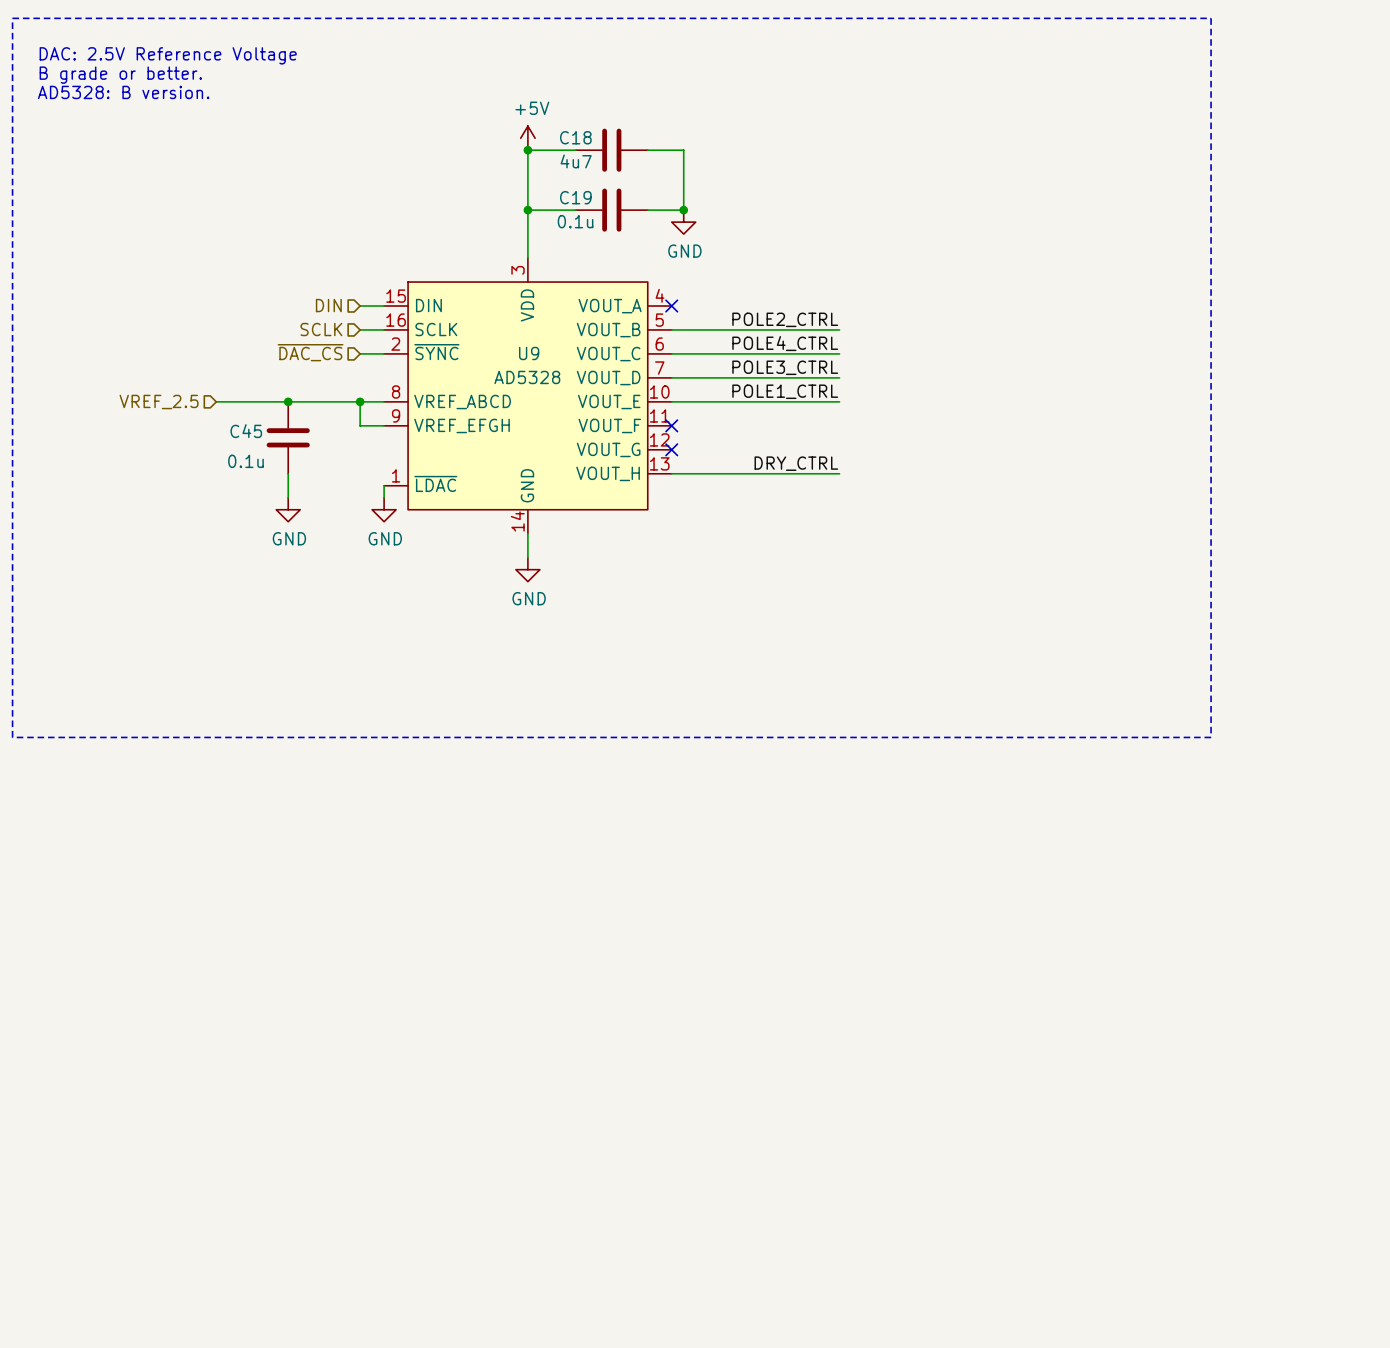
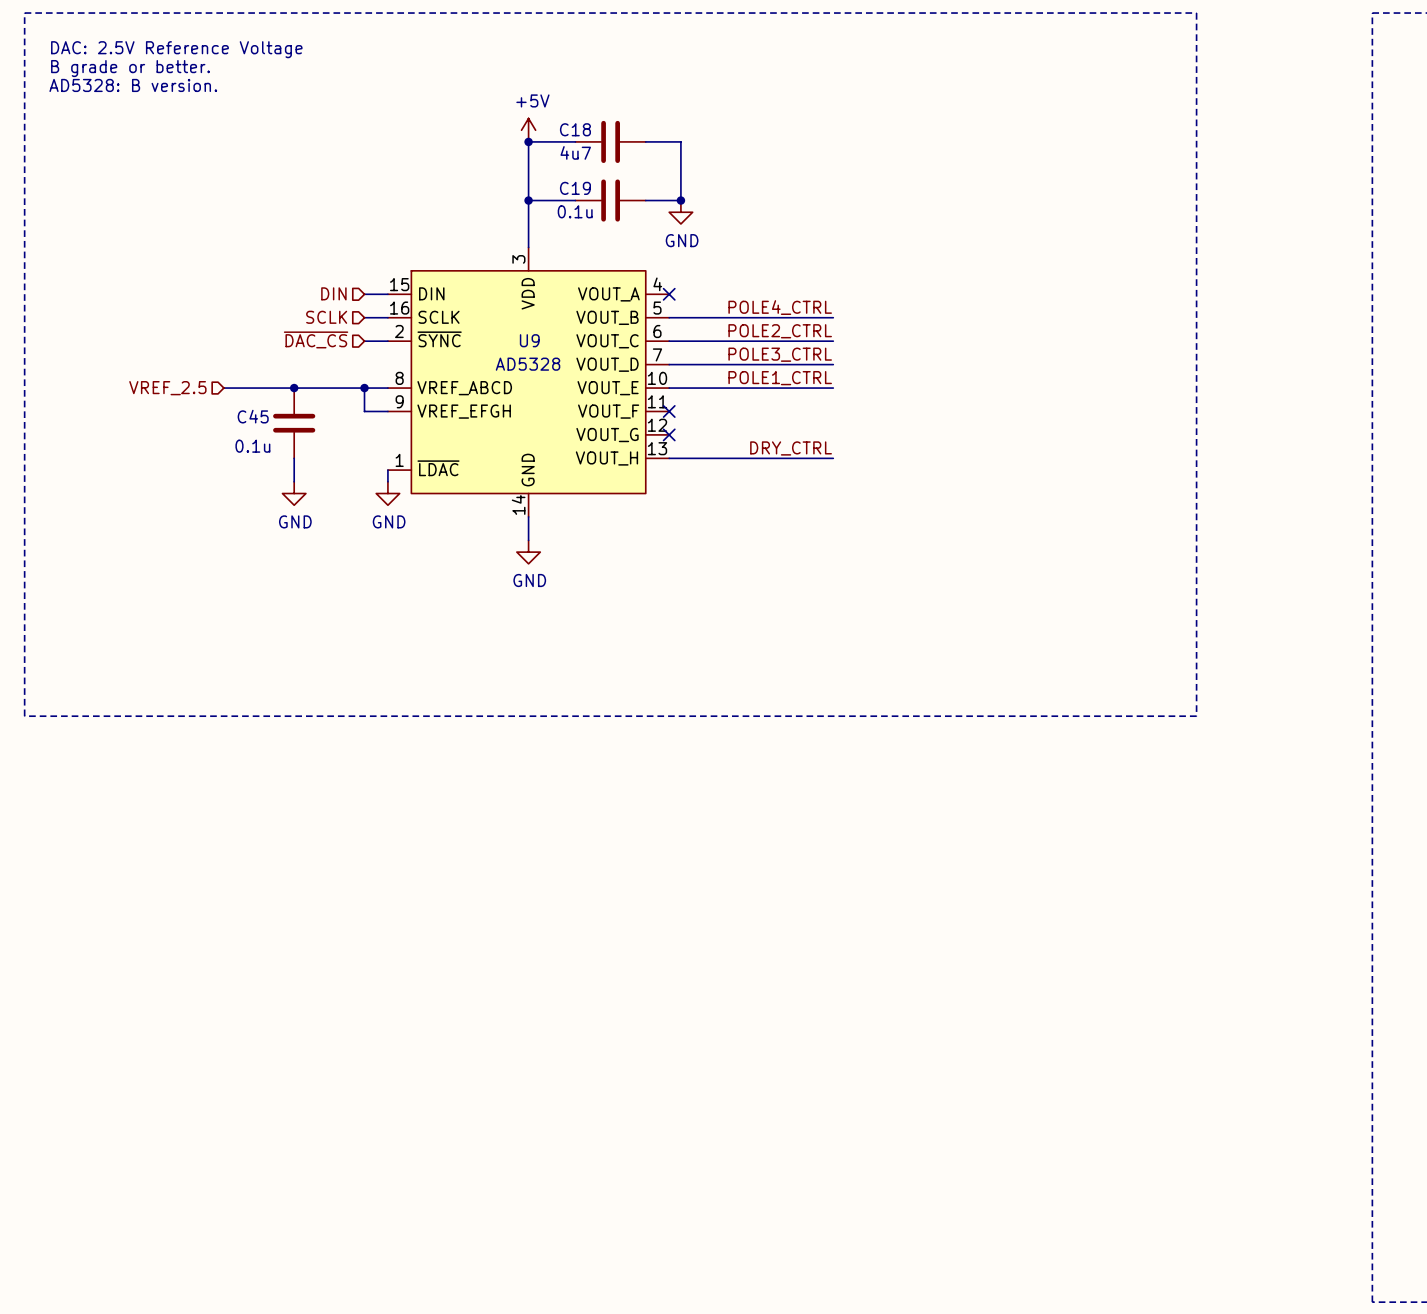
label: POLE2_CTRL (785, 319) -> POLE4_CTRL (780, 307)
label: POLE4_CTRL (785, 343) -> POLE2_CTRL (780, 331)

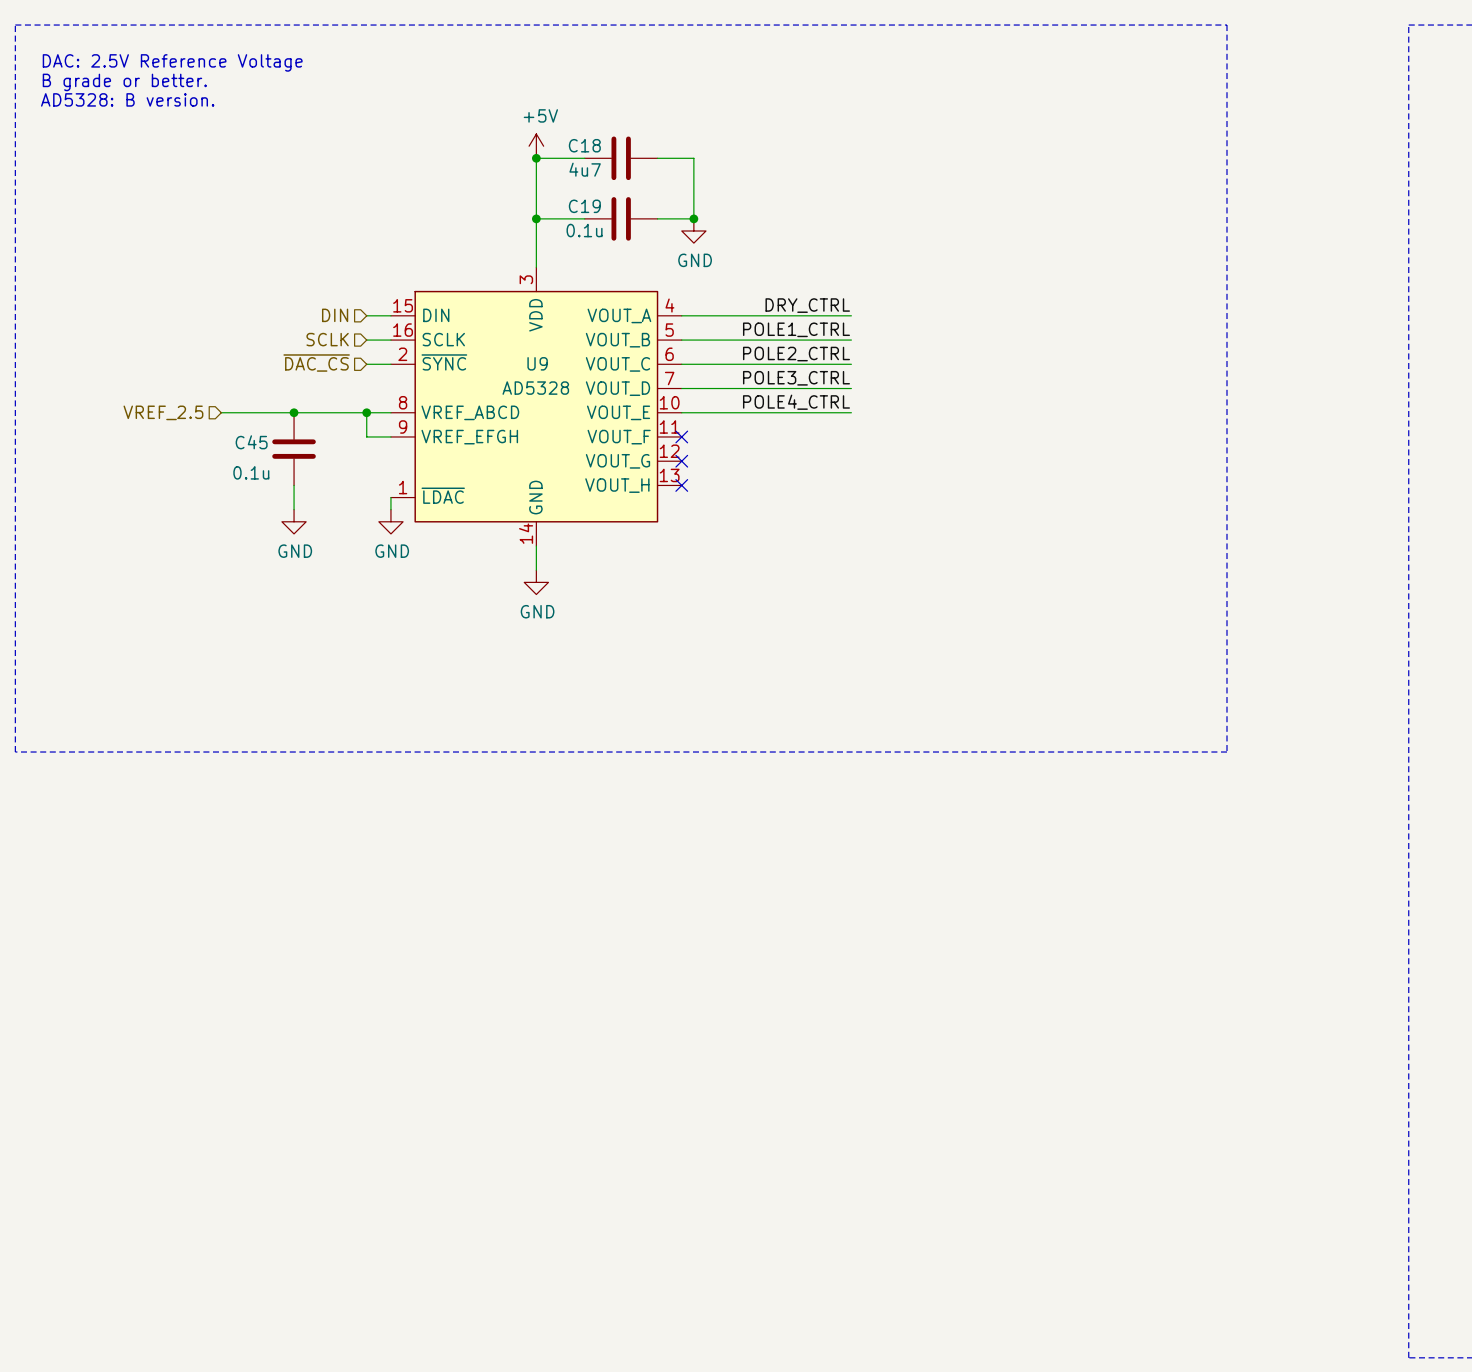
no-connect mark: (669, 294) -> none
label: POLE4_CTRL (780, 307) -> POLE1_CTRL (796, 329)
label: POLE1_CTRL (780, 378) -> POLE4_CTRL (796, 402)
label position: DRY_CTRL (791, 448) -> DRY_CTRL (807, 305)
wire: (669, 458) (833, 458) -> (681, 315) (851, 315)
no-connect mark: none -> (681, 485)

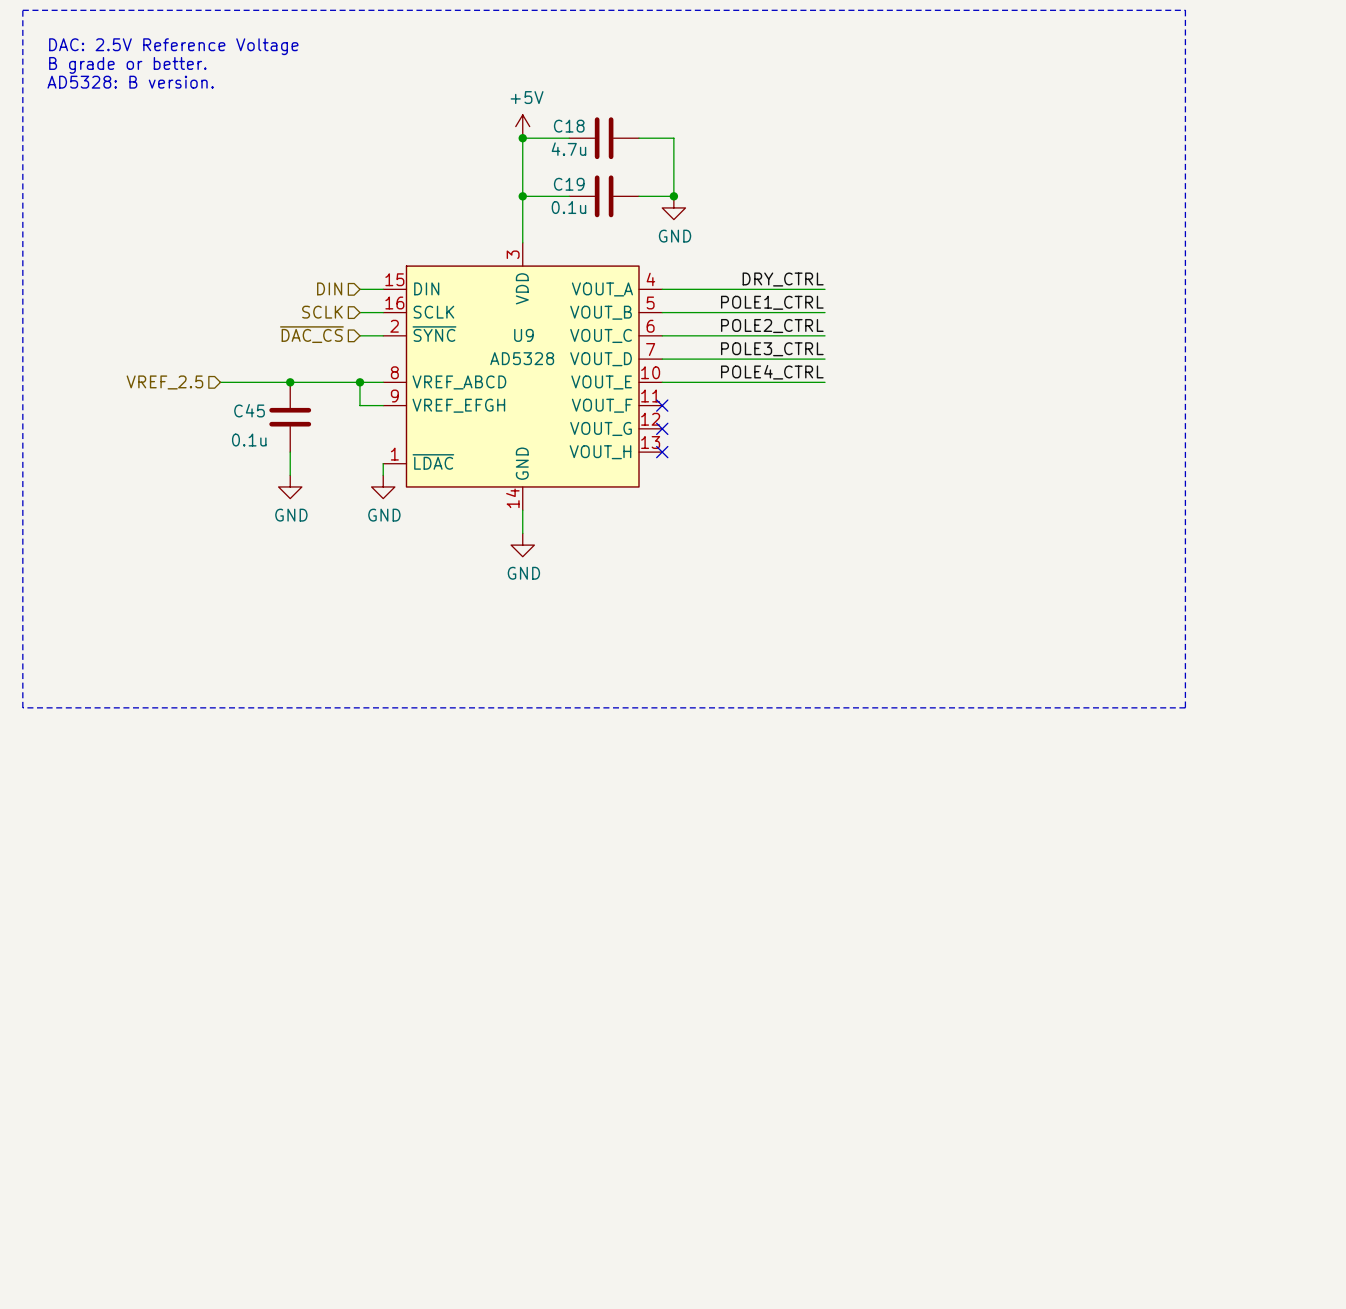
C18 value: 4u7 (585, 169) -> 4.7u (568, 149)

